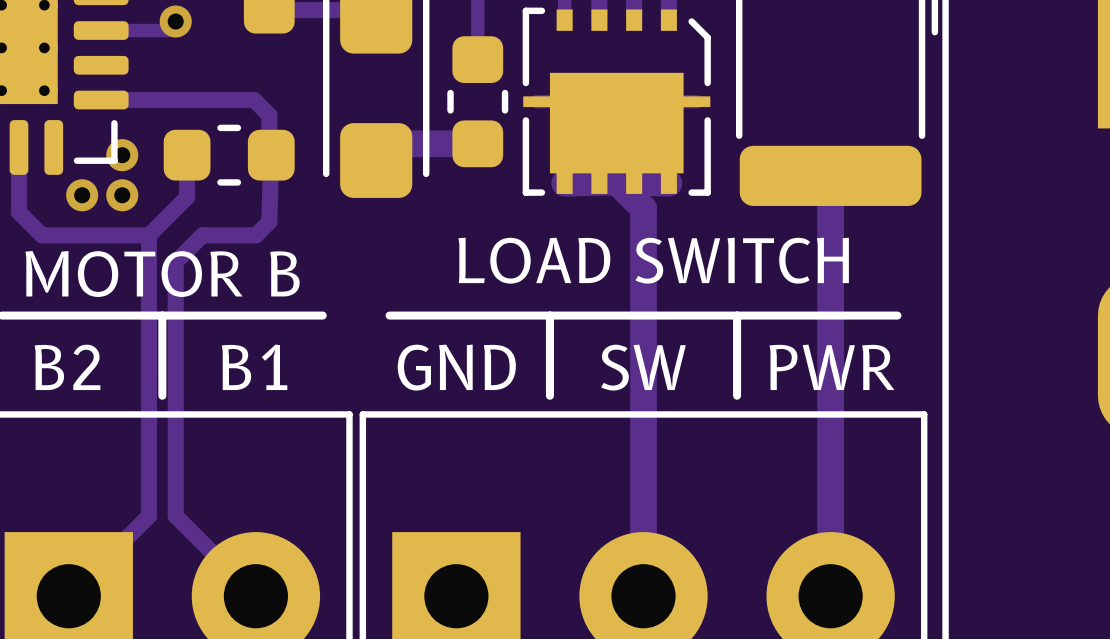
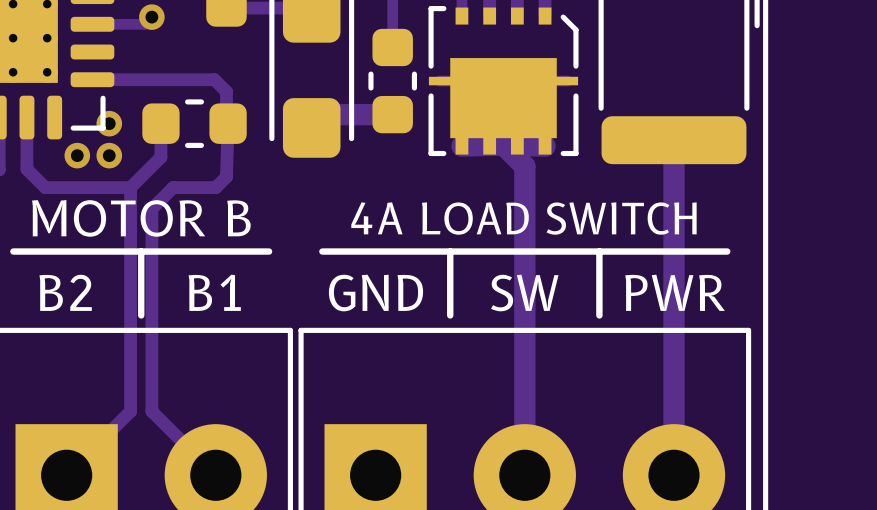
text: LOAD SWITCH (653, 260) -> 4A LOAD SWITCH (523, 218)

